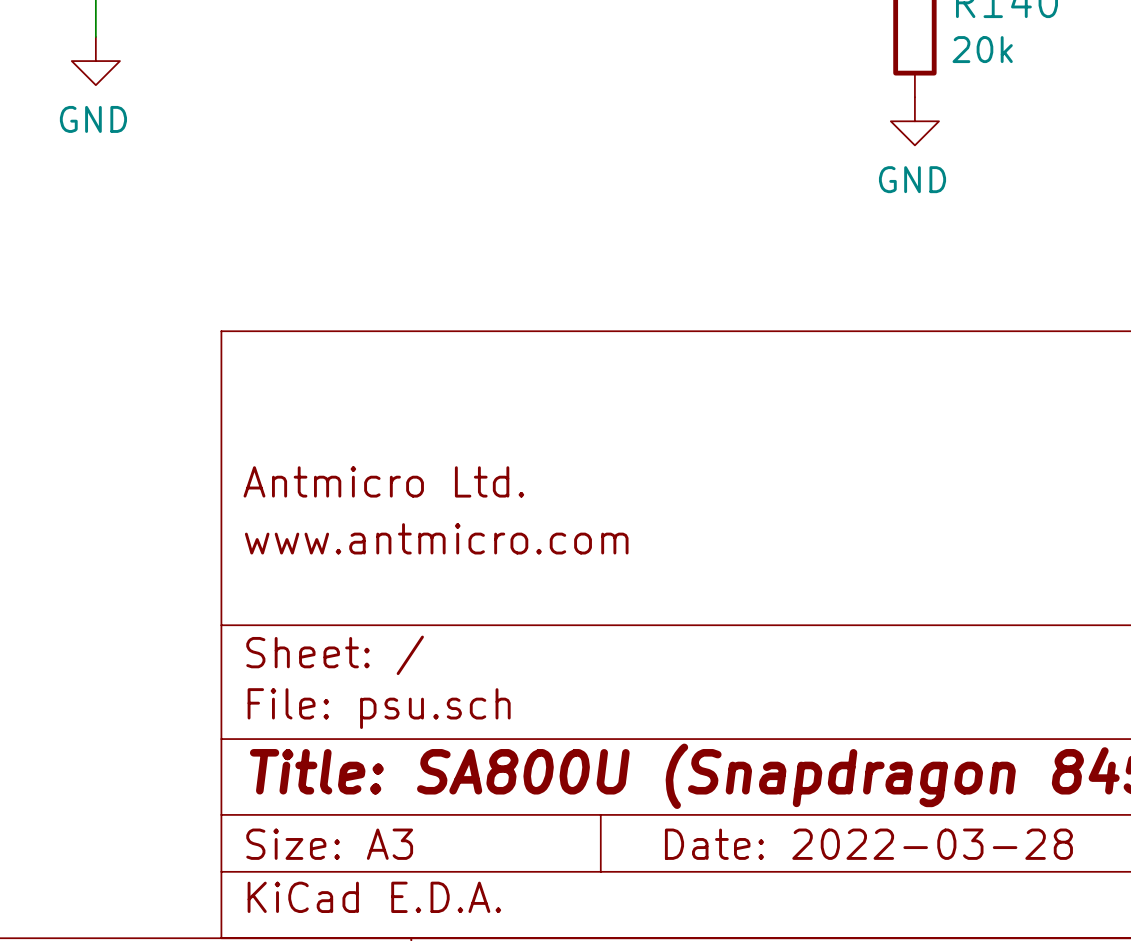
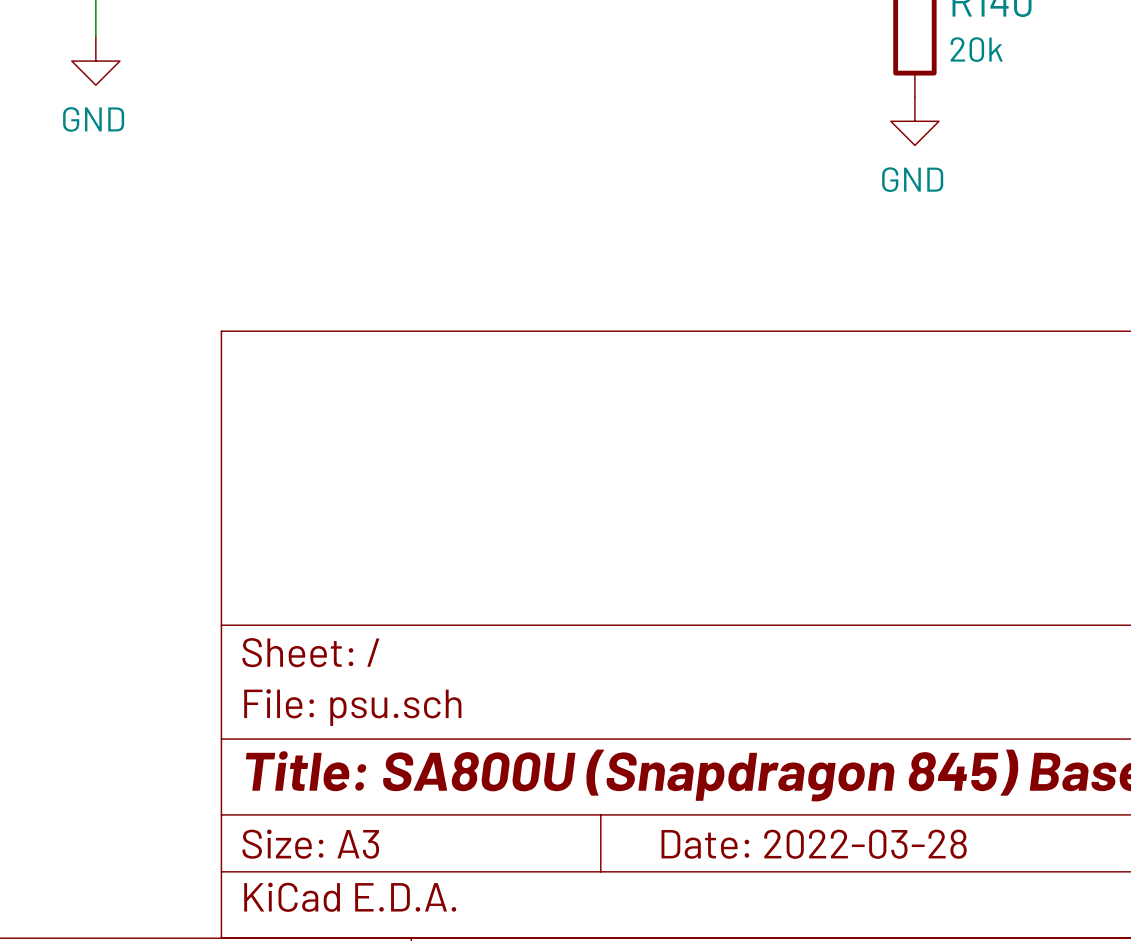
title block: Antmicro Ltd. (383, 481) -> none
title block: www.antmicro.com (436, 538) -> none

